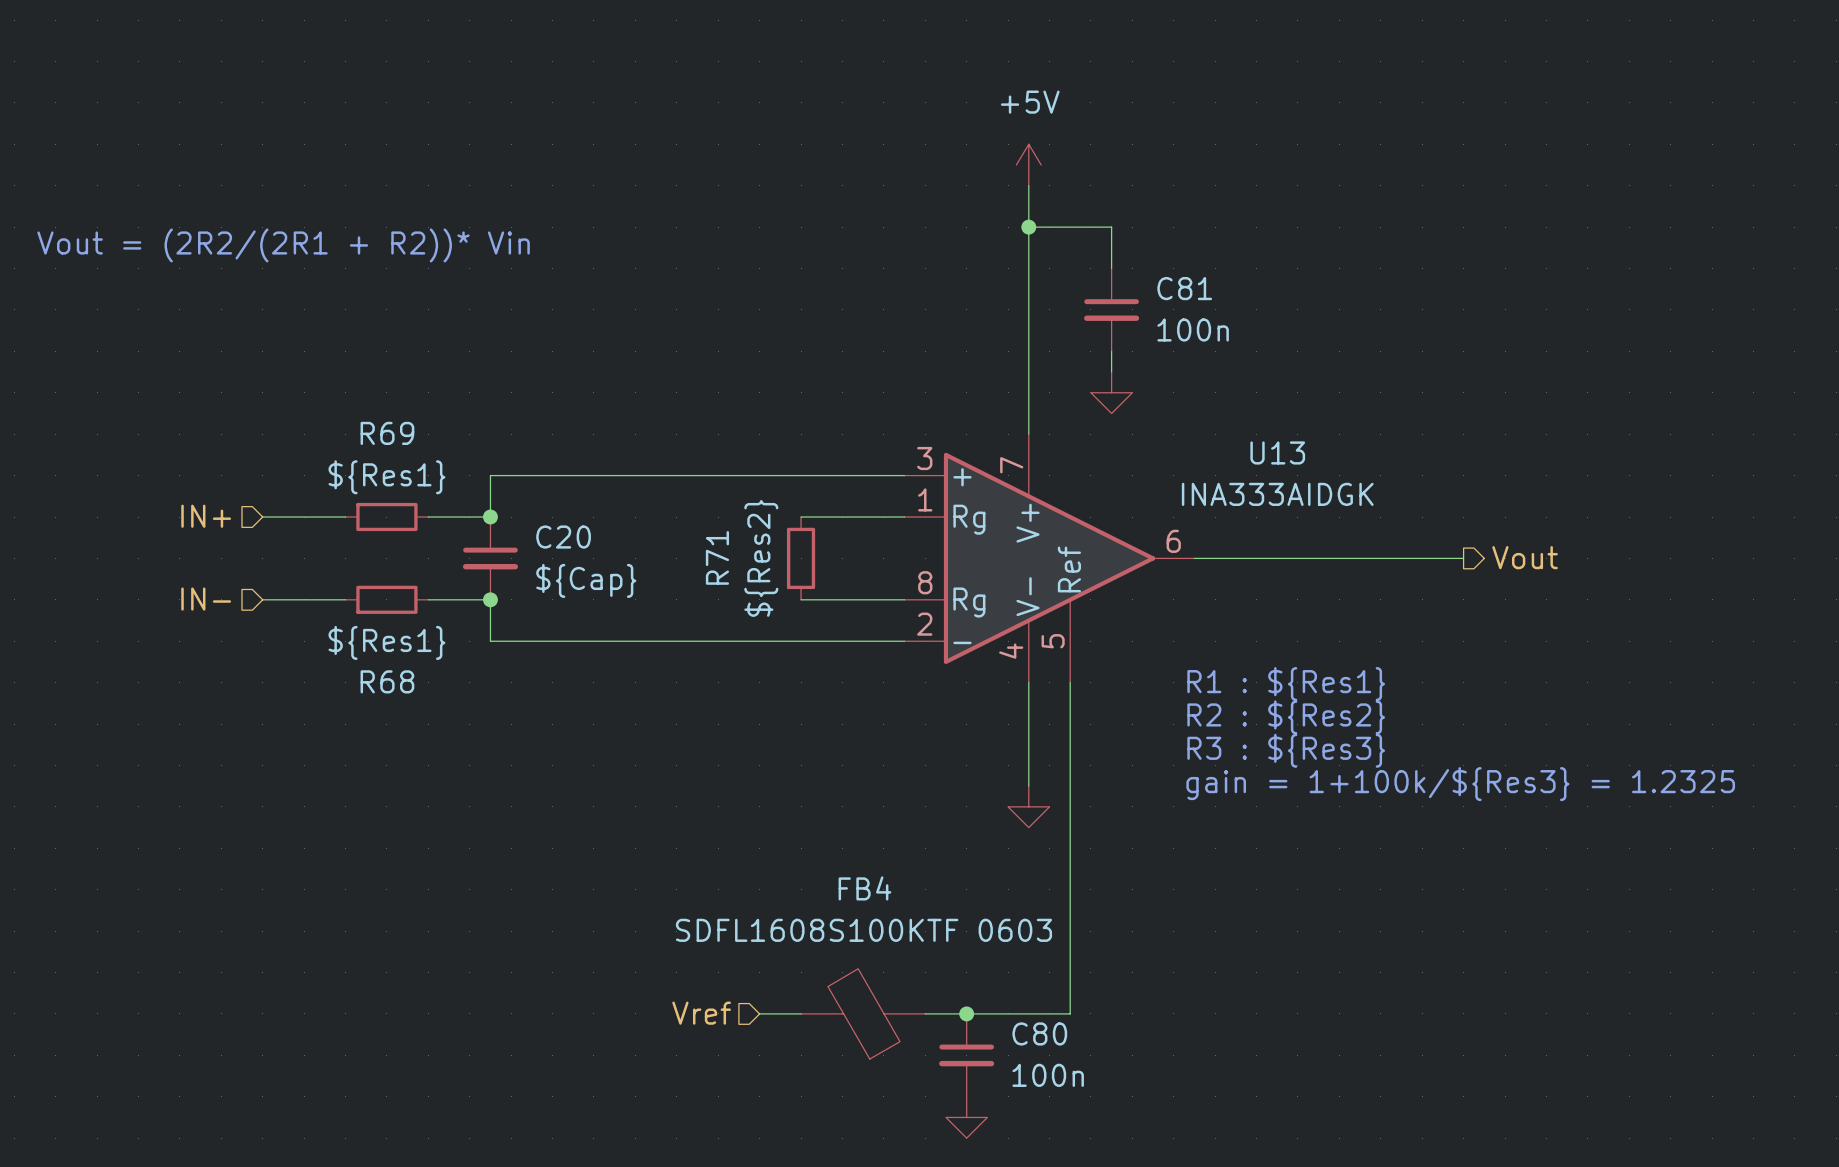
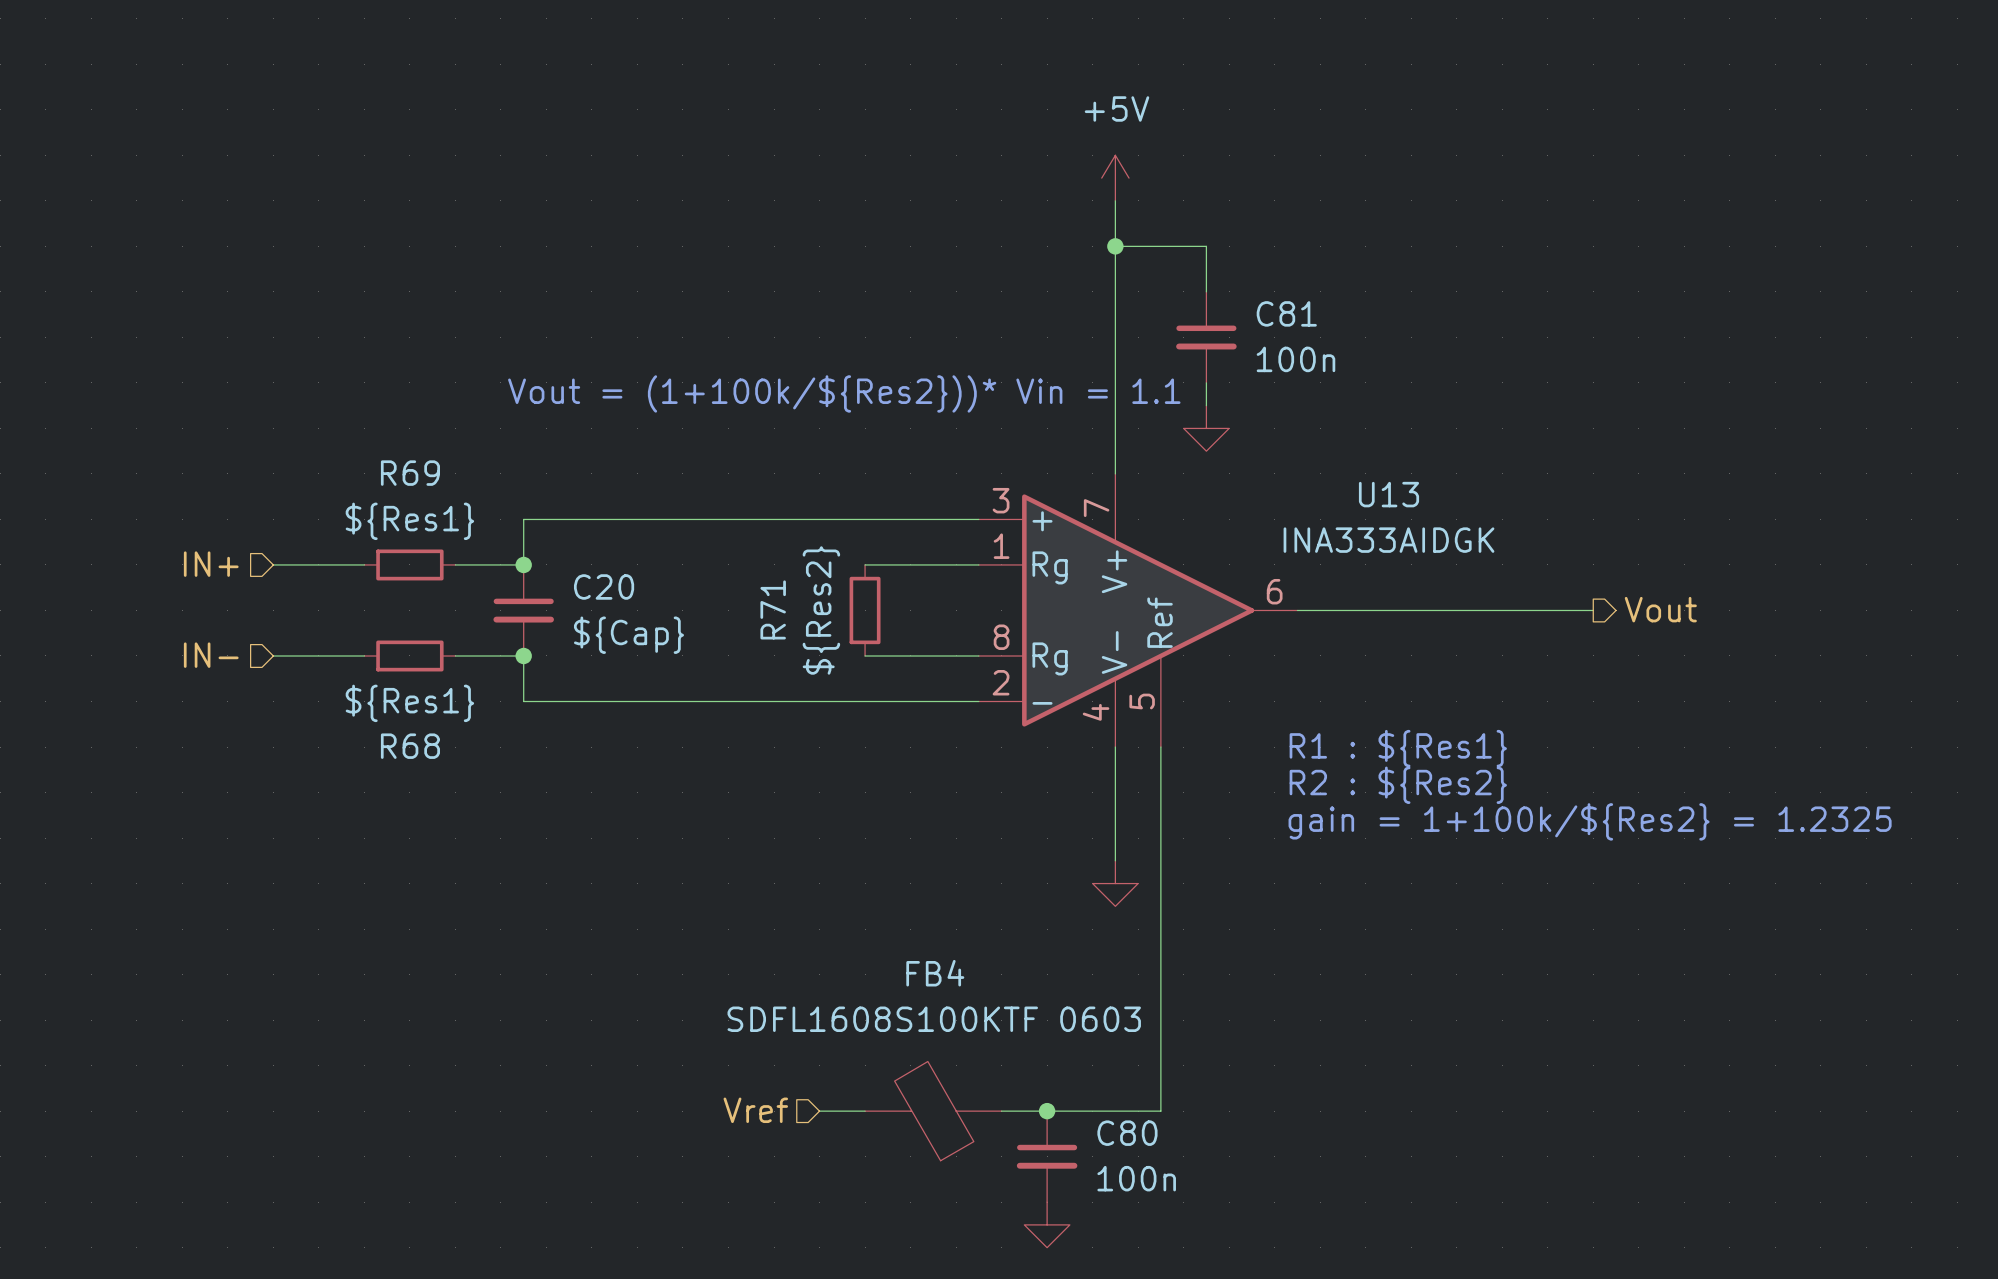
text: Vout = (2R2/(2R1 + R2))* Vin (283, 245) -> none
text: none -> Vout = (1+100k/${Res2}))* Vin = 1.1 (844, 393)
text: R3 : ${Res3} (1286, 750) -> gain = 1+100k/${Res2} = 1.2325 (1590, 821)
text: gain = 1+100k/${Res3} = 1.2325 (1460, 784) -> none

